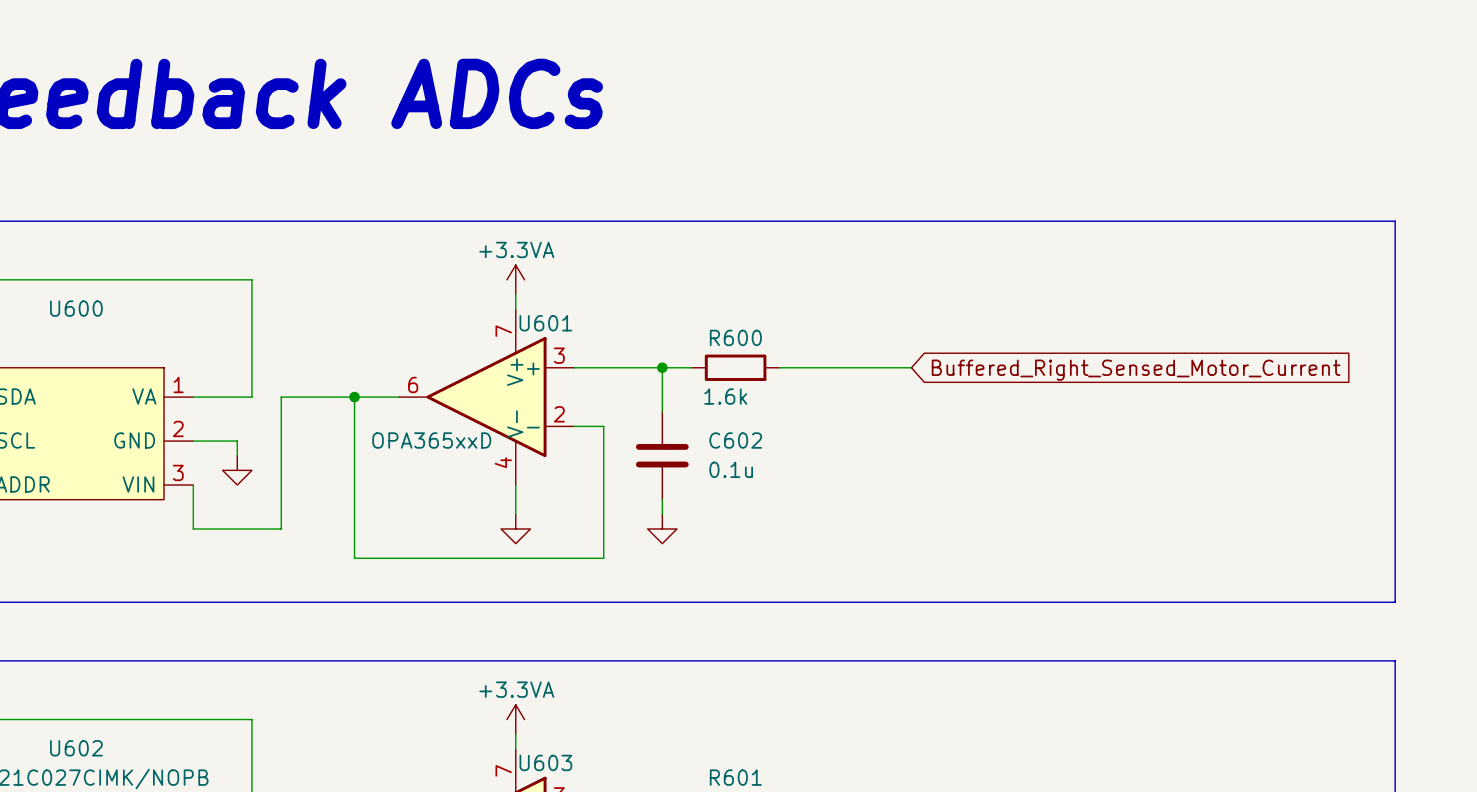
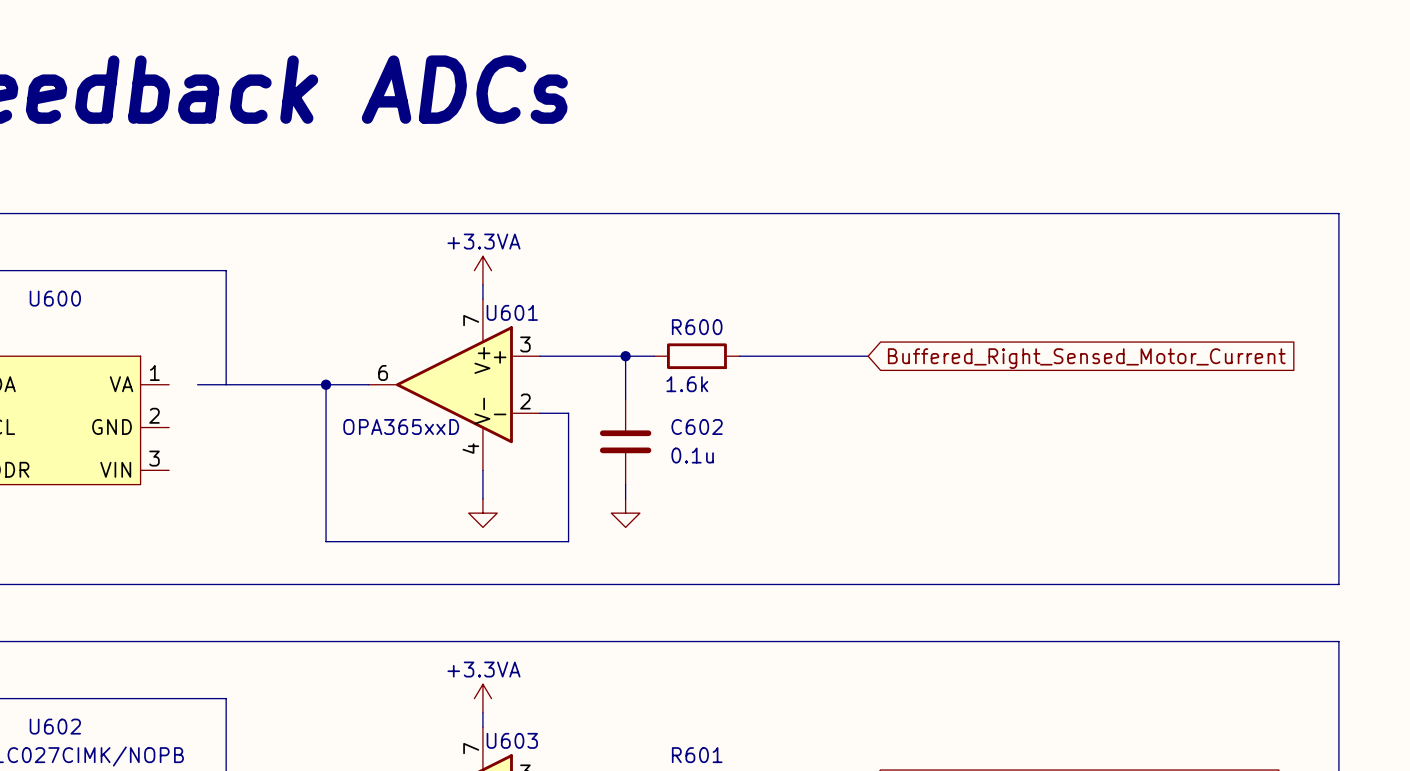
wire: (193, 397) (222, 397) -> none
wire: (281, 397) (281, 528) (193, 528) (193, 485) -> (254, 384) (226, 384)
wire: (193, 441) (237, 441) (237, 455) -> none
power symbol: (237, 470) -> none

